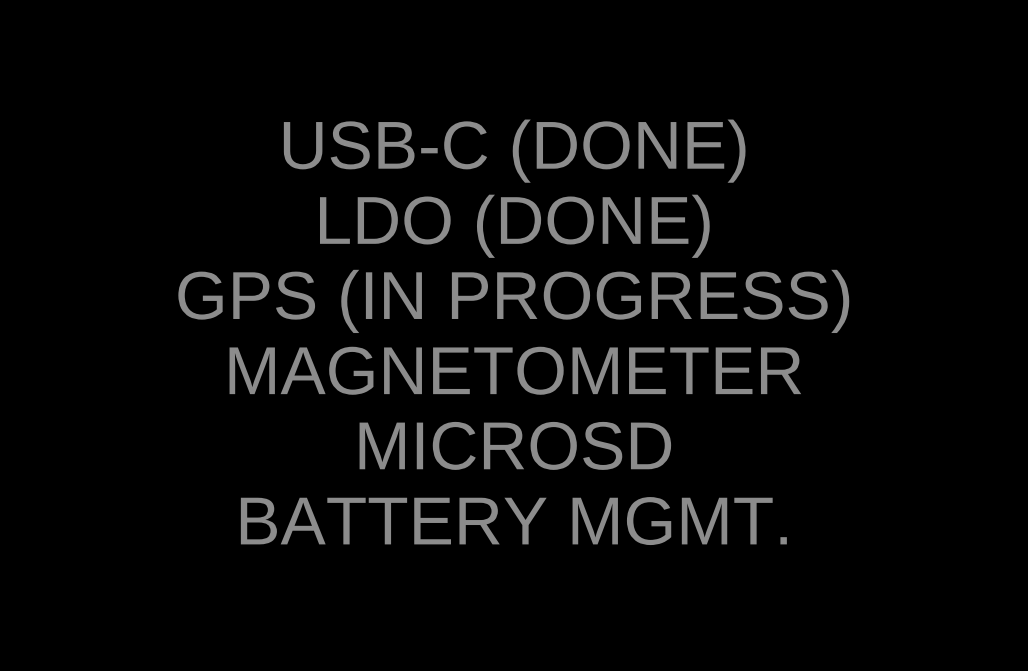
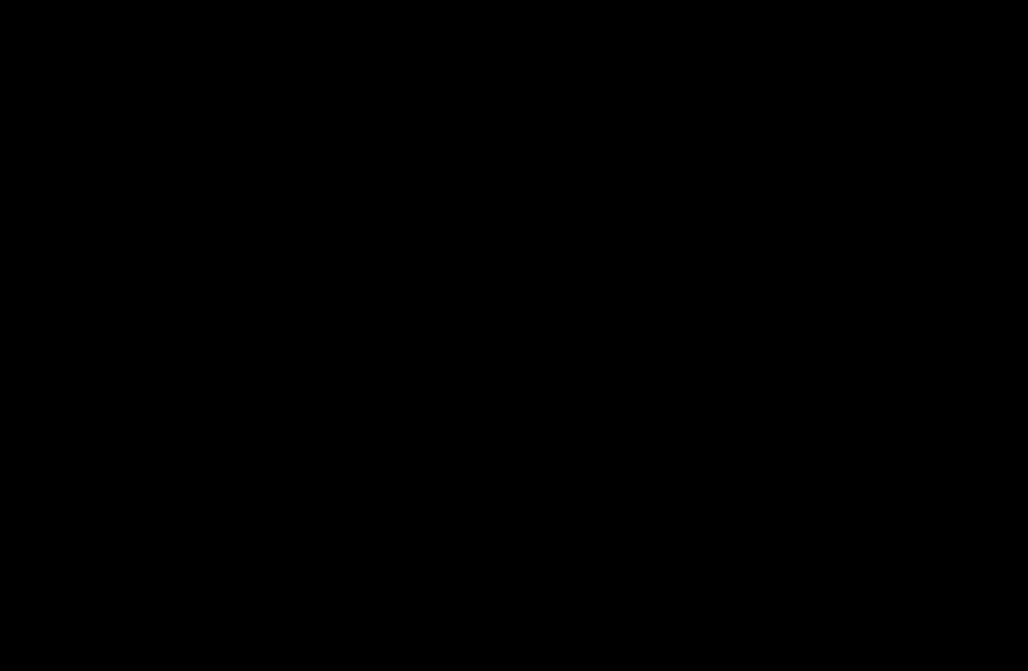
text: USB-C (DONE) (514, 151) -> none
text: LDO (DONE) (514, 226) -> none
text: GPS (IN PROGRESS) (513, 301) -> none
text: MAGNETOMETER (515, 370) -> none
text: MICROSD (515, 445) -> none
text: BATTERY MGMT. (513, 521) -> none

